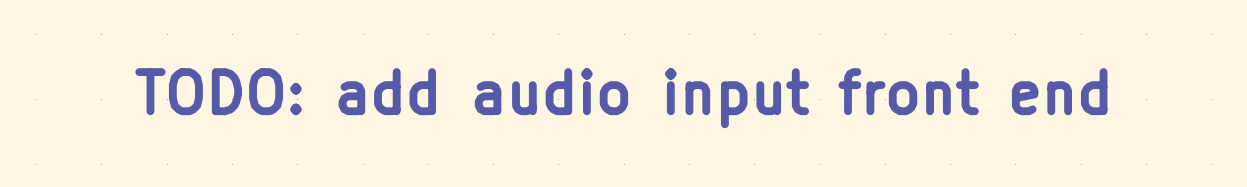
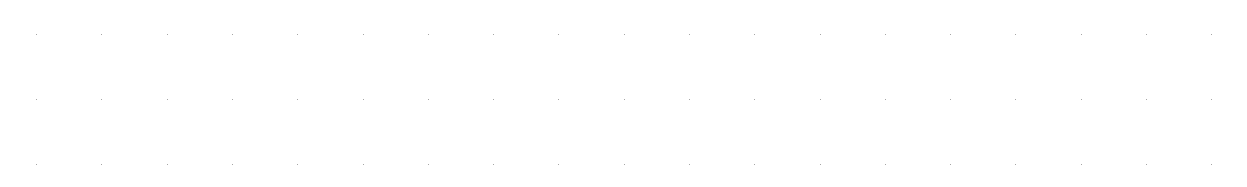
text: TODO: add audio input front end (621, 98) -> none

